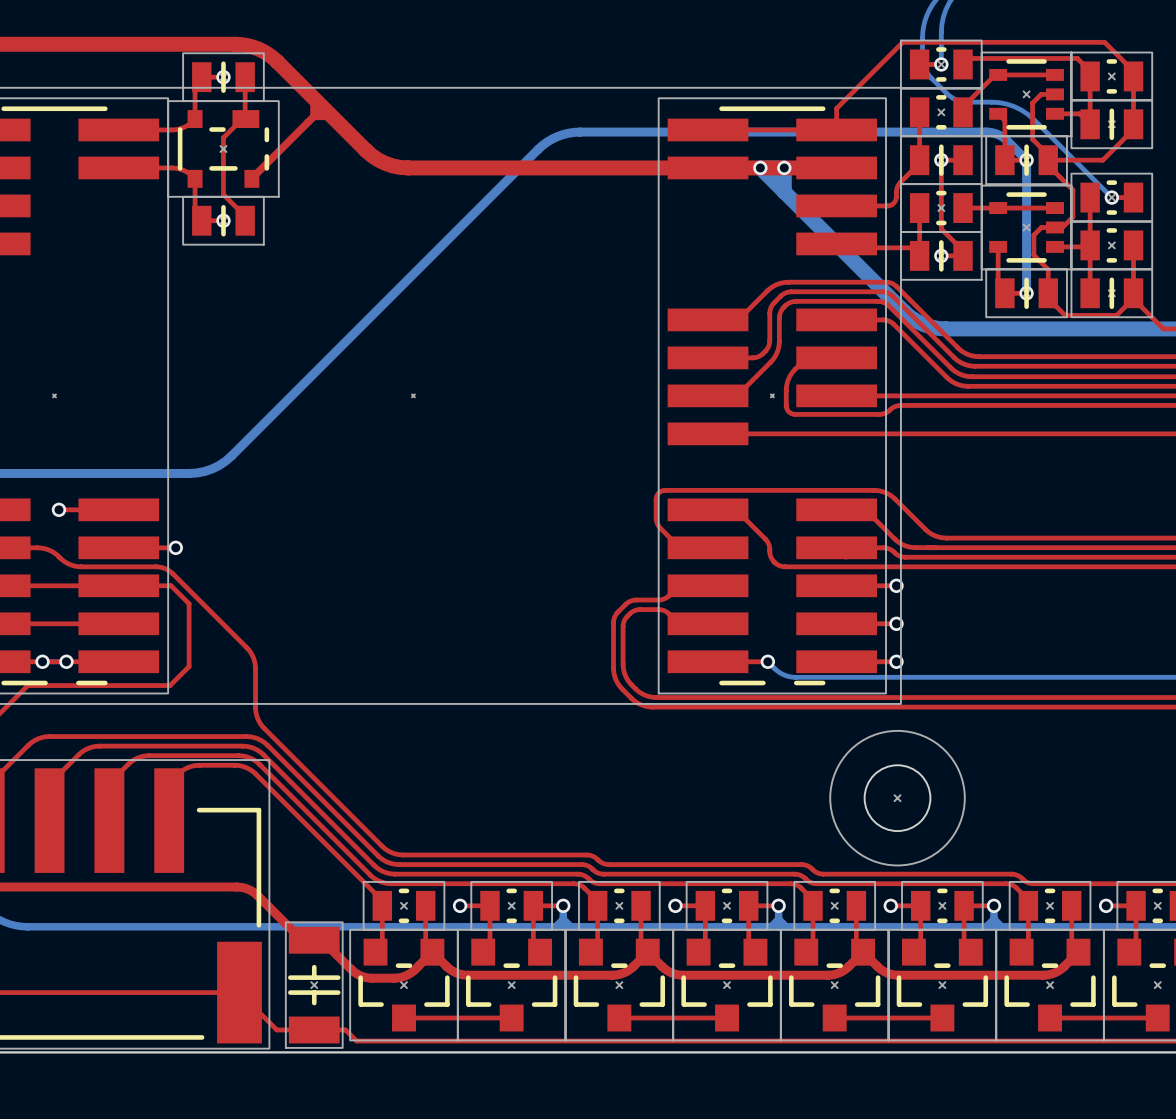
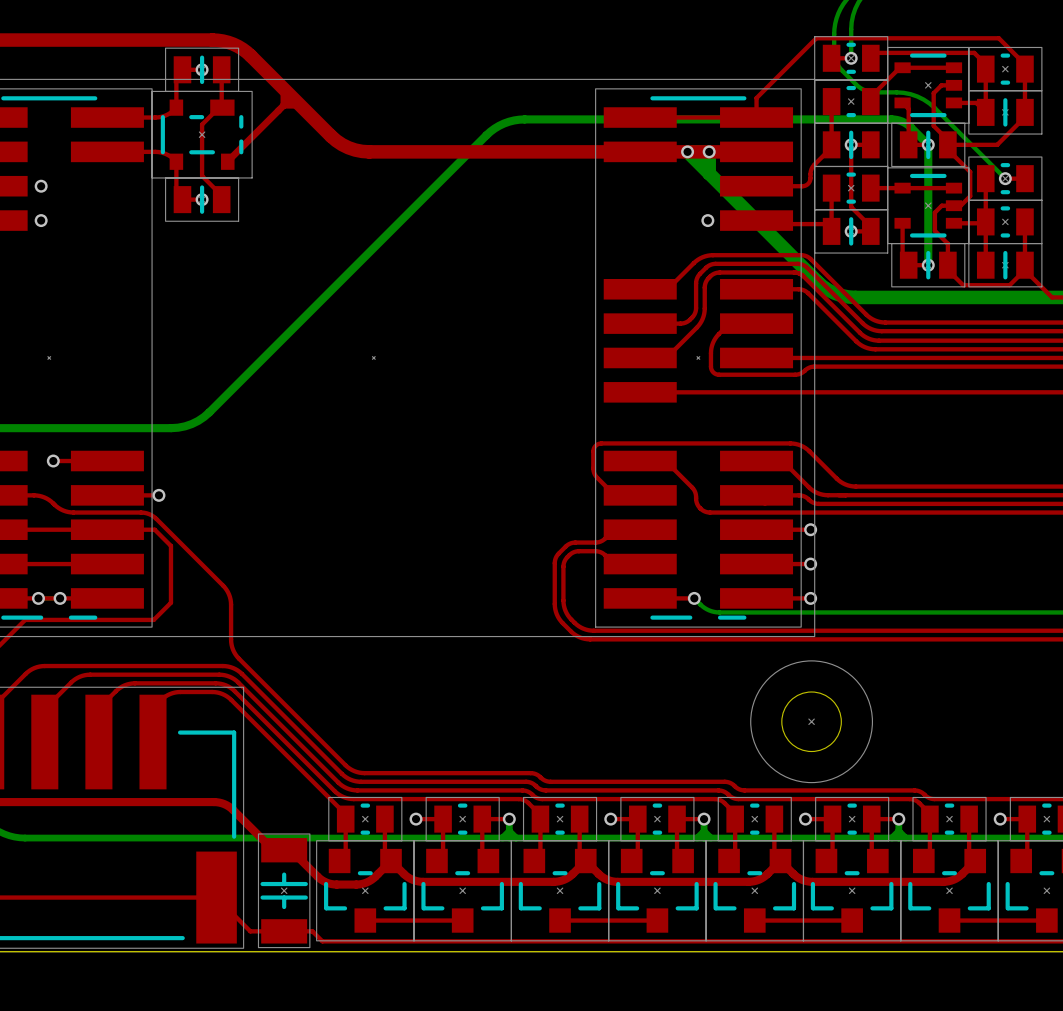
via: none -> (41, 186)
via: none -> (41, 220)
via: none -> (707, 220)

